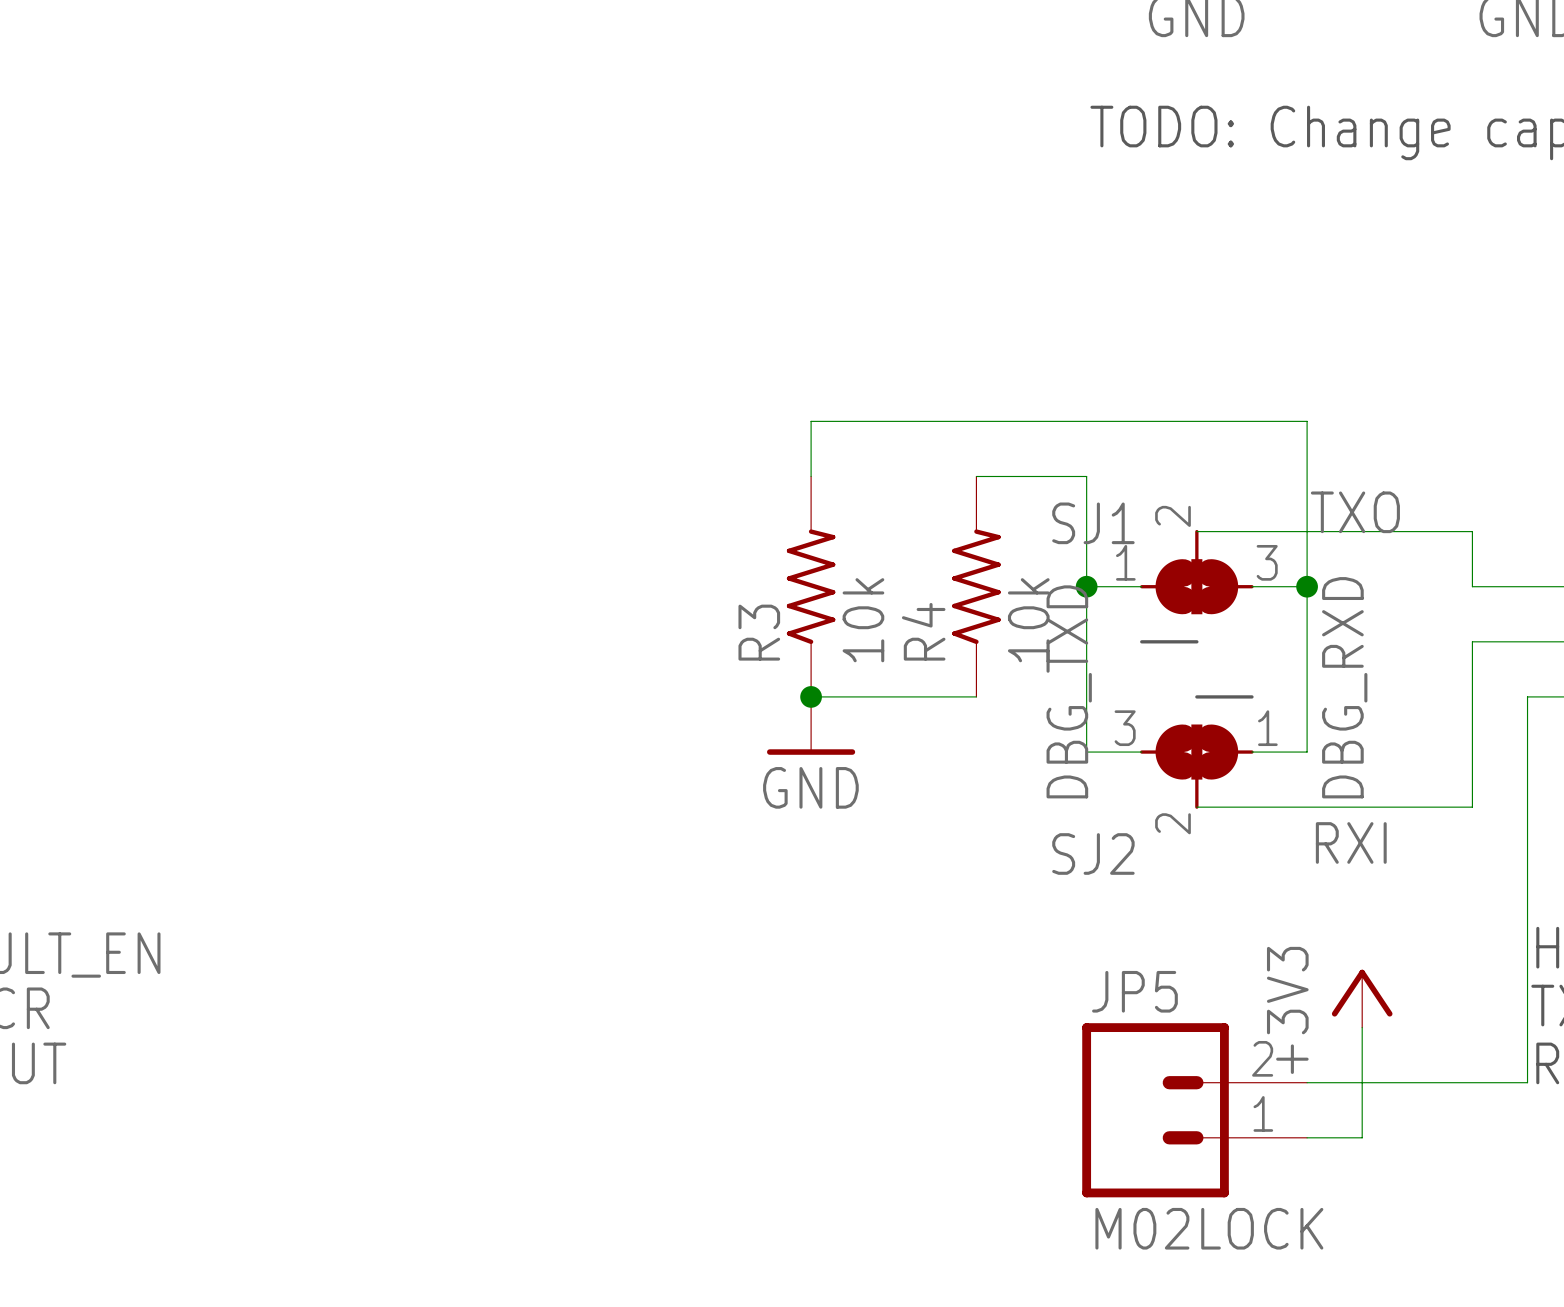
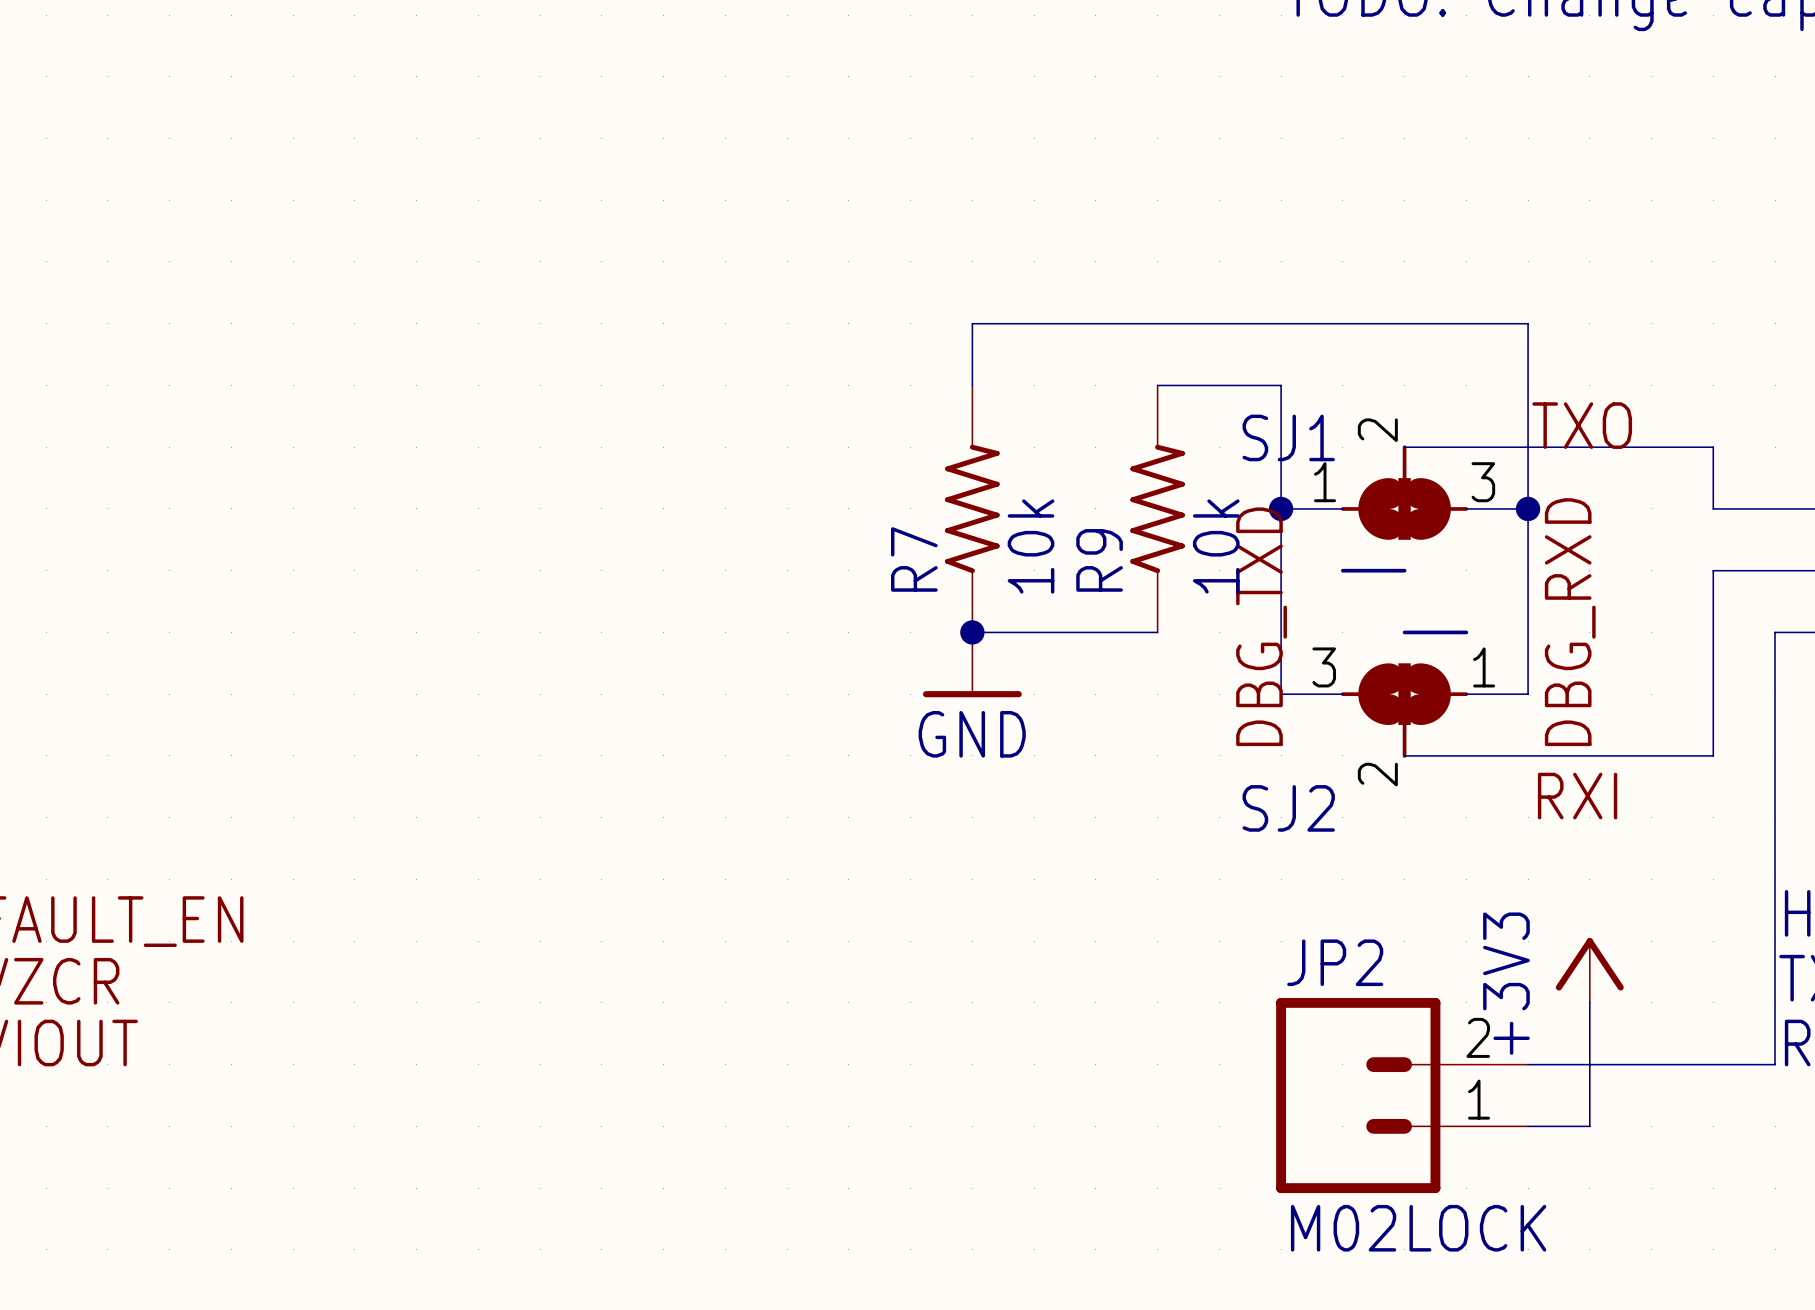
R4 name: R4 (923, 631) -> R9 (1099, 560)
R3 name: R3 (759, 632) -> R7 (914, 559)
JP5 name: JP5 (1134, 991) -> JP2 (1335, 962)

